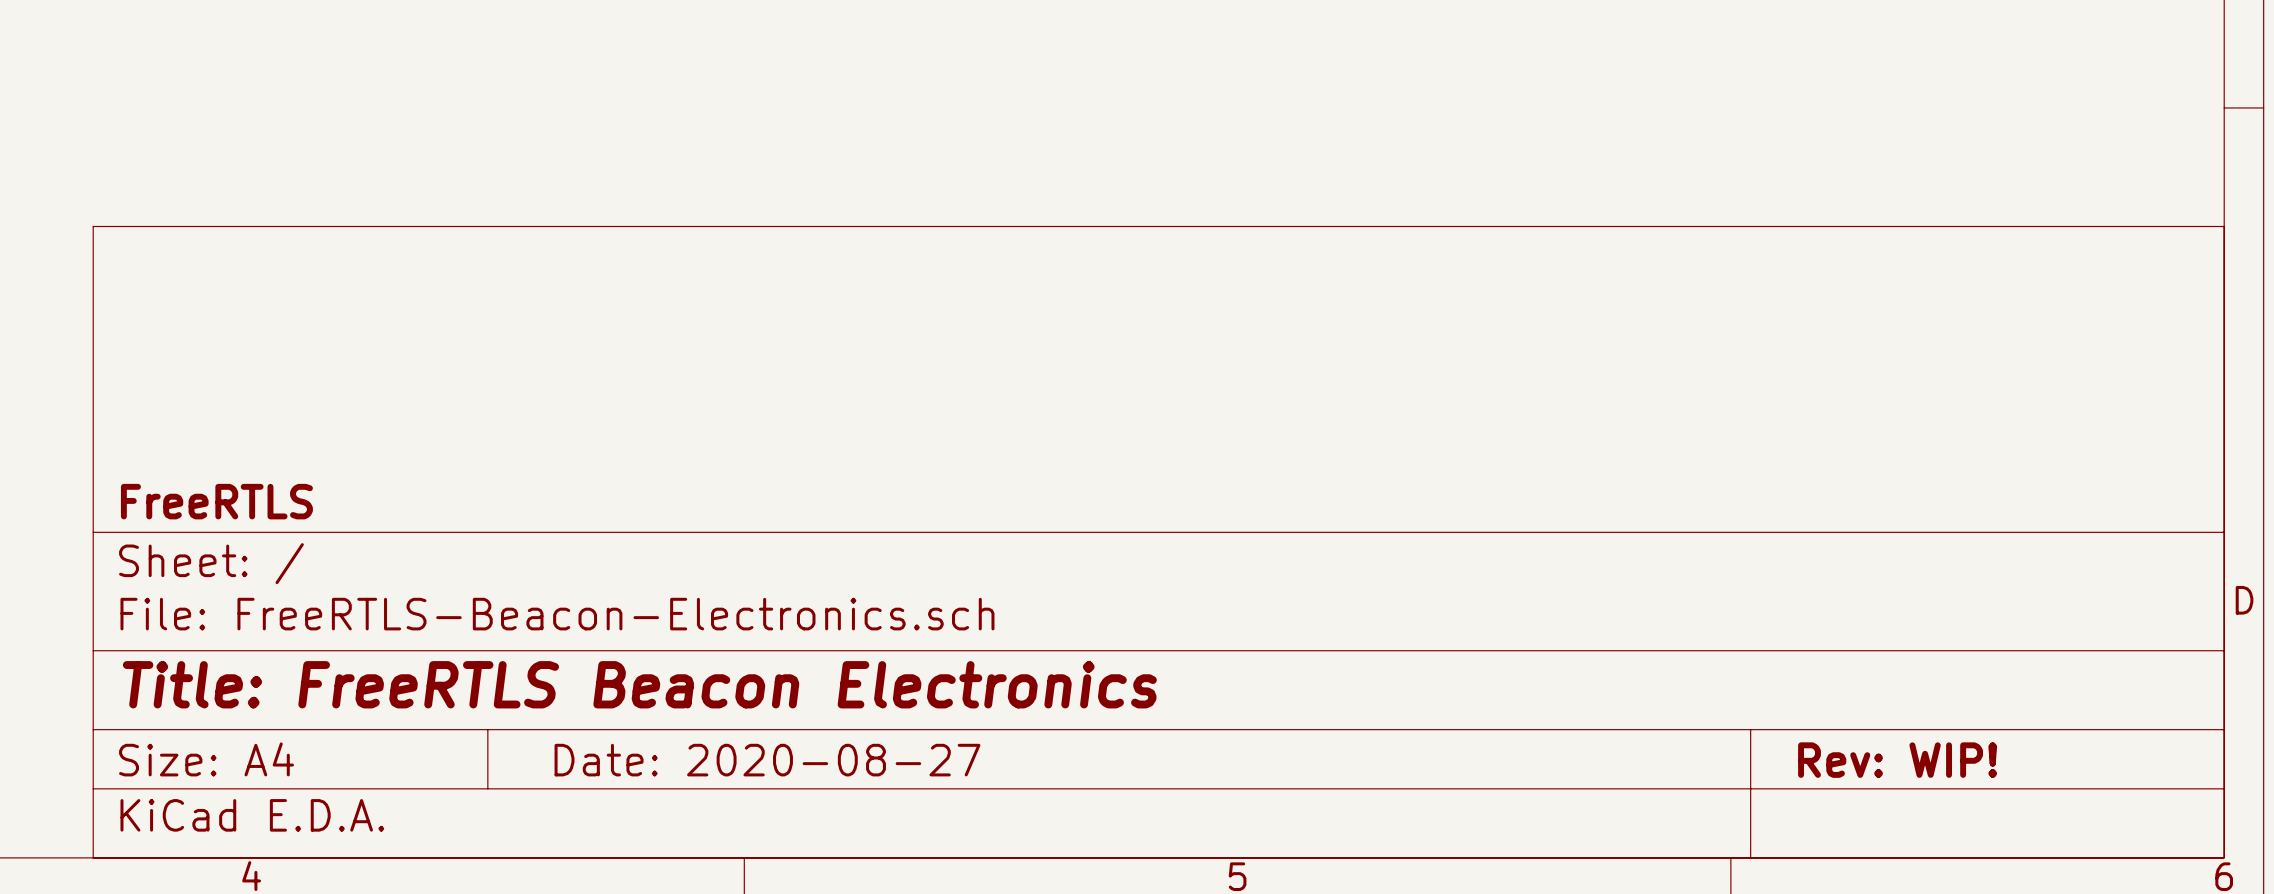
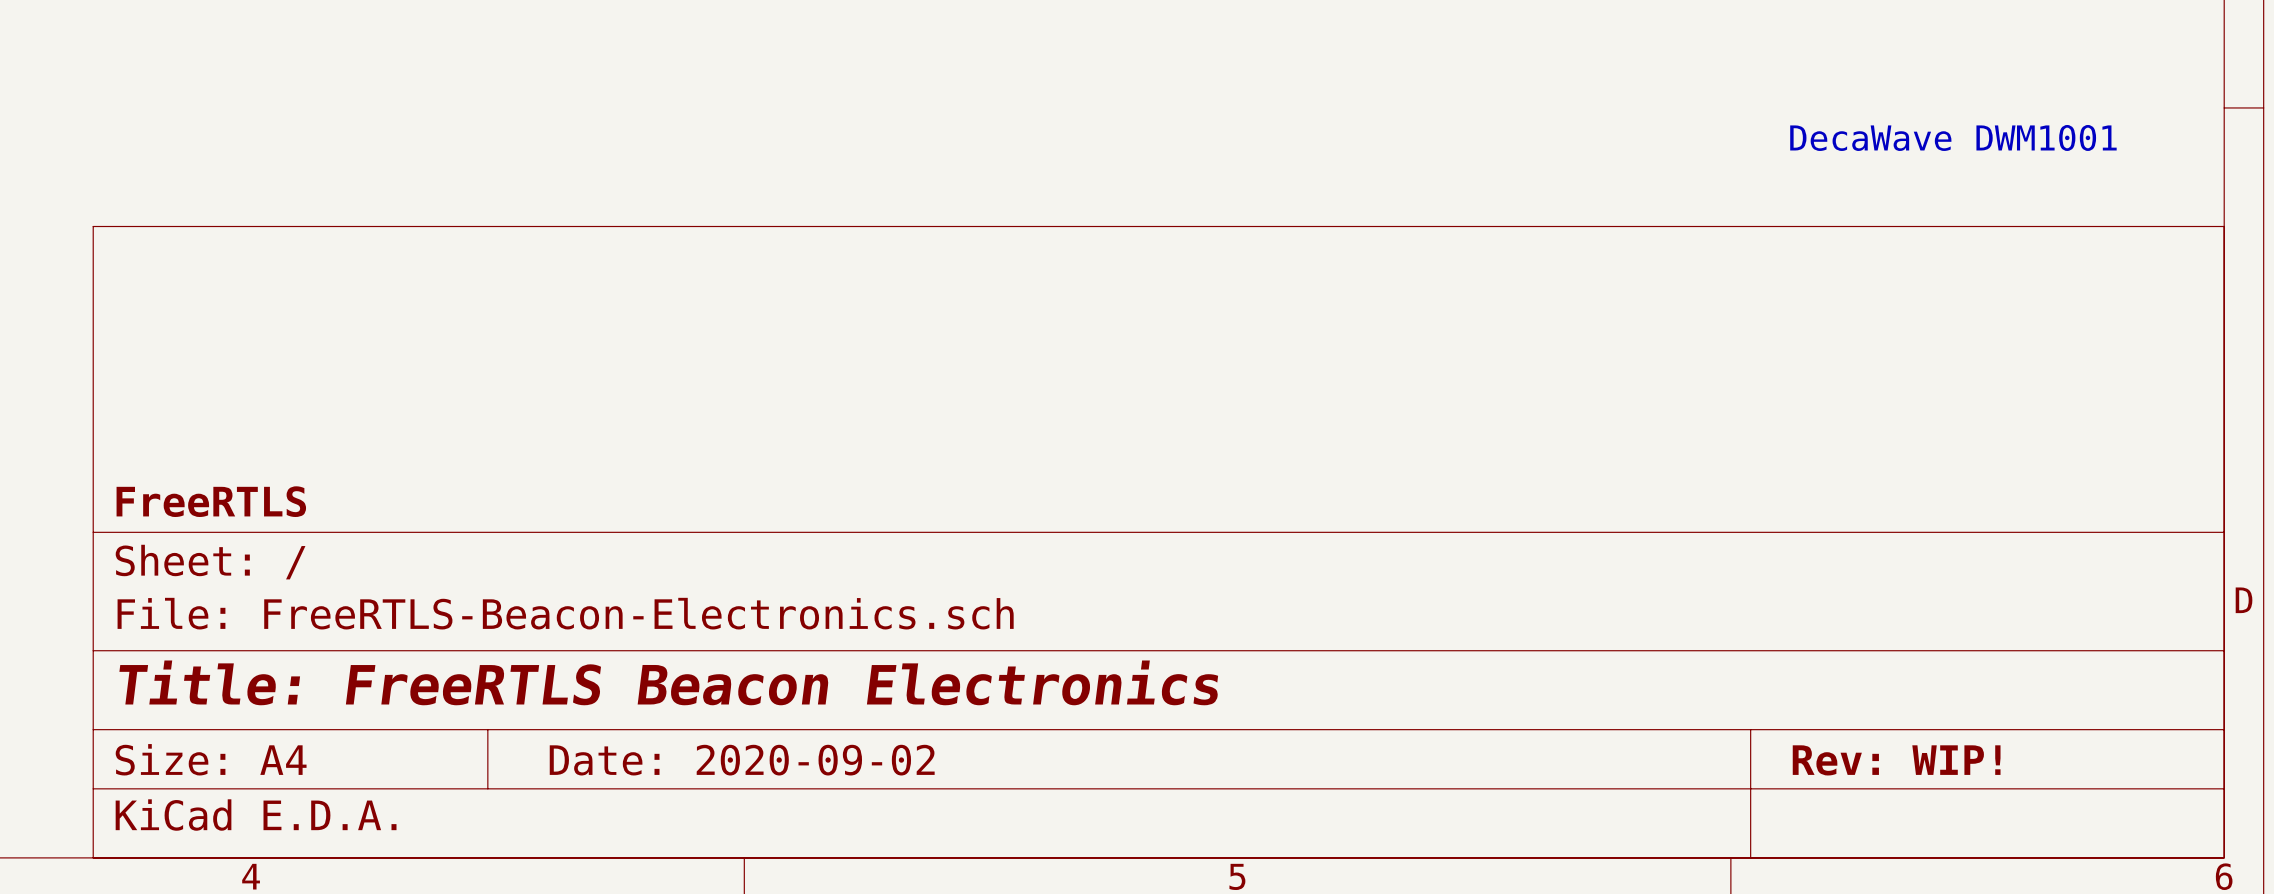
text: none -> DecaWave DWM1001 (1953, 137)
title block: Date: 2020-08-27 (767, 760) -> Date: 2020-09-02 (742, 760)

